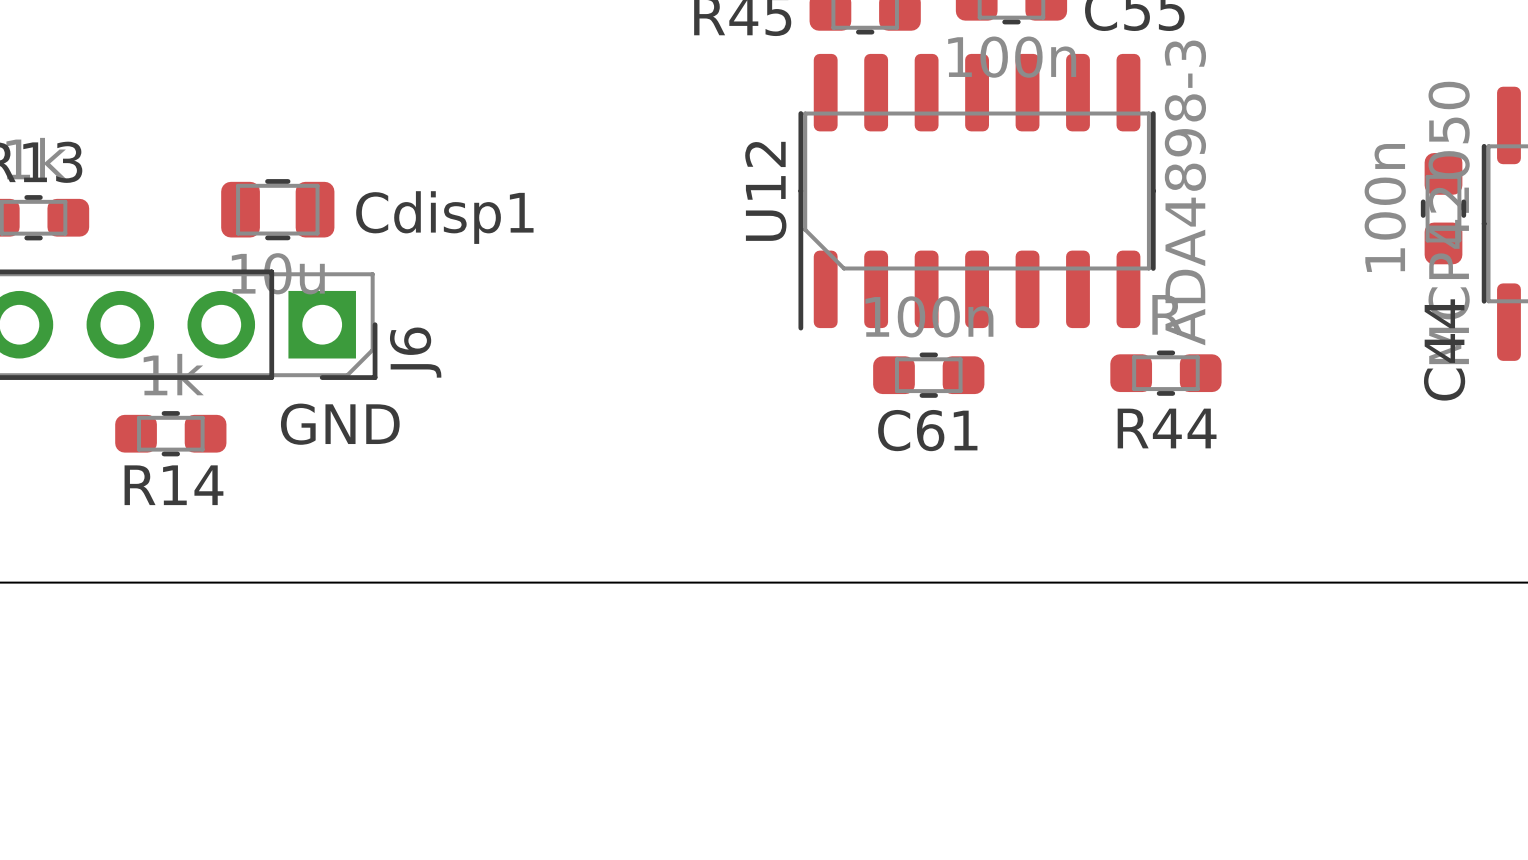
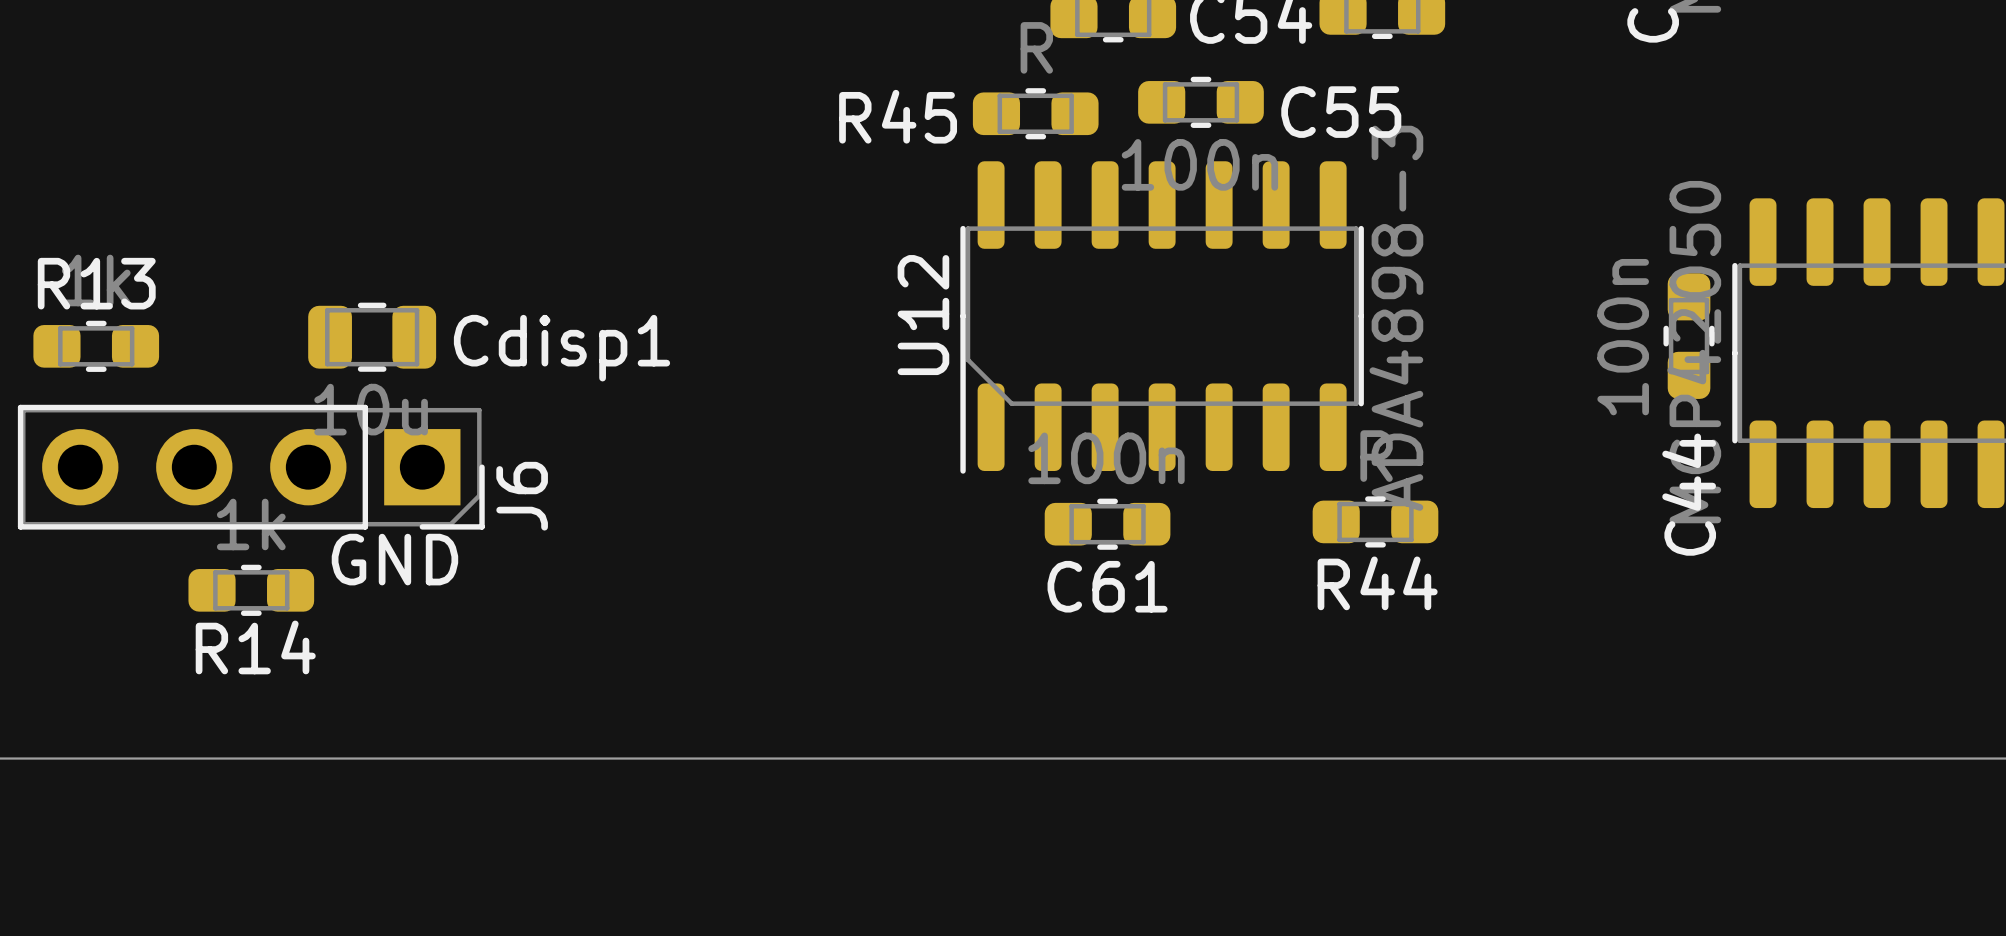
text position: GND (340, 424) -> GND (394, 559)

